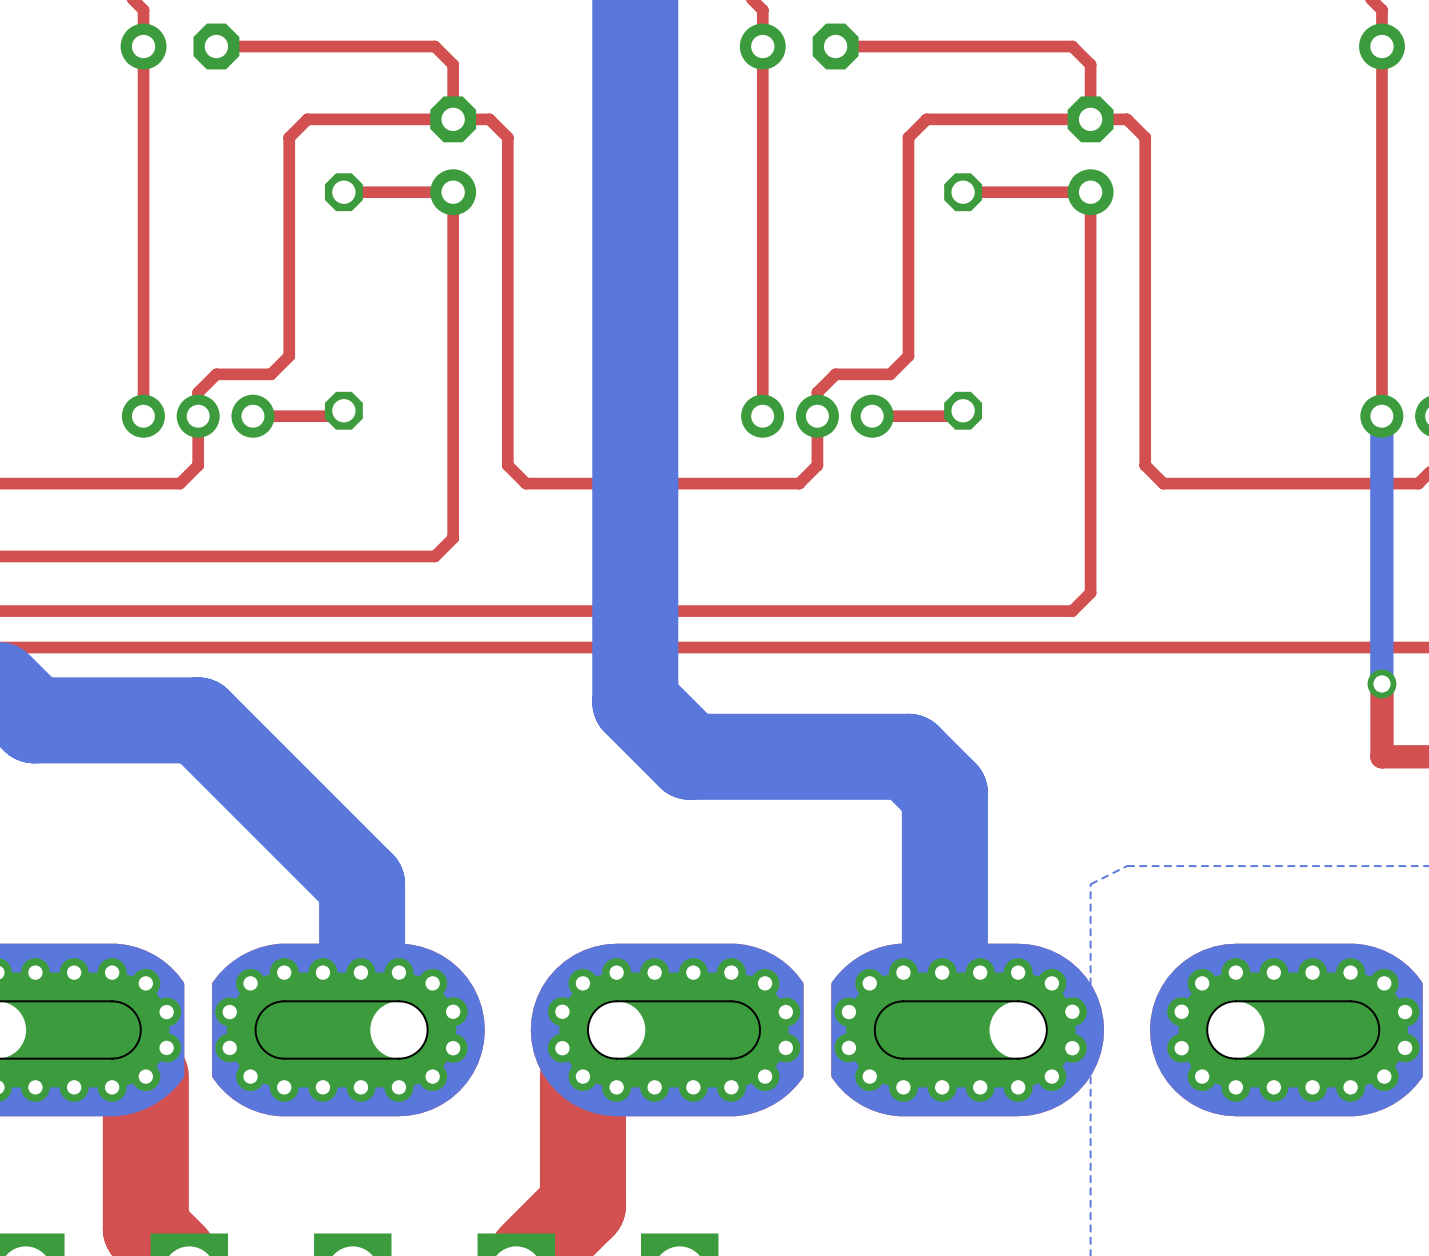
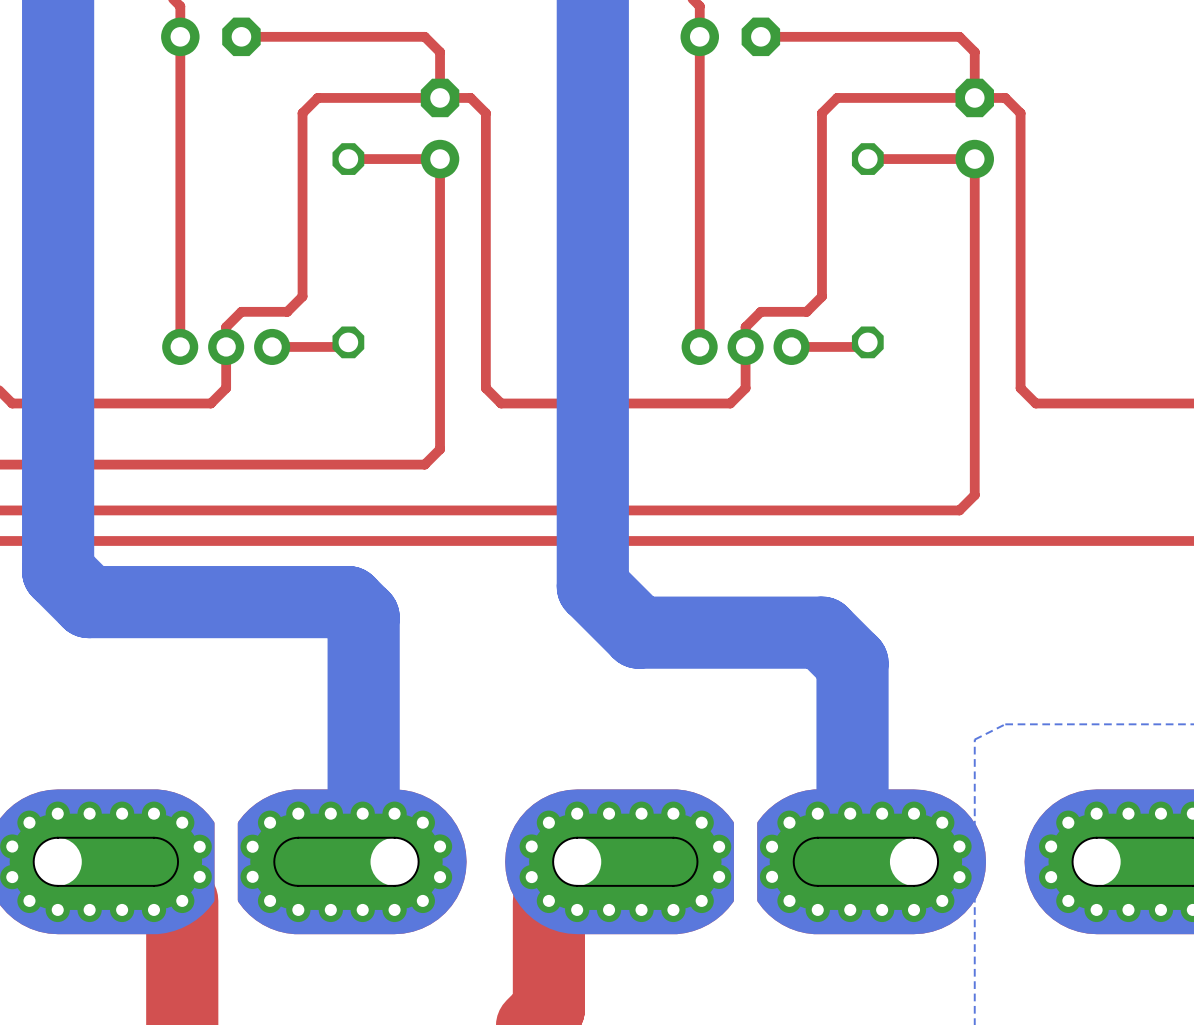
bottom track: (198, 720) (362, 884) -> (226, 602) (348, 602) (363, 617) (363, 739)

